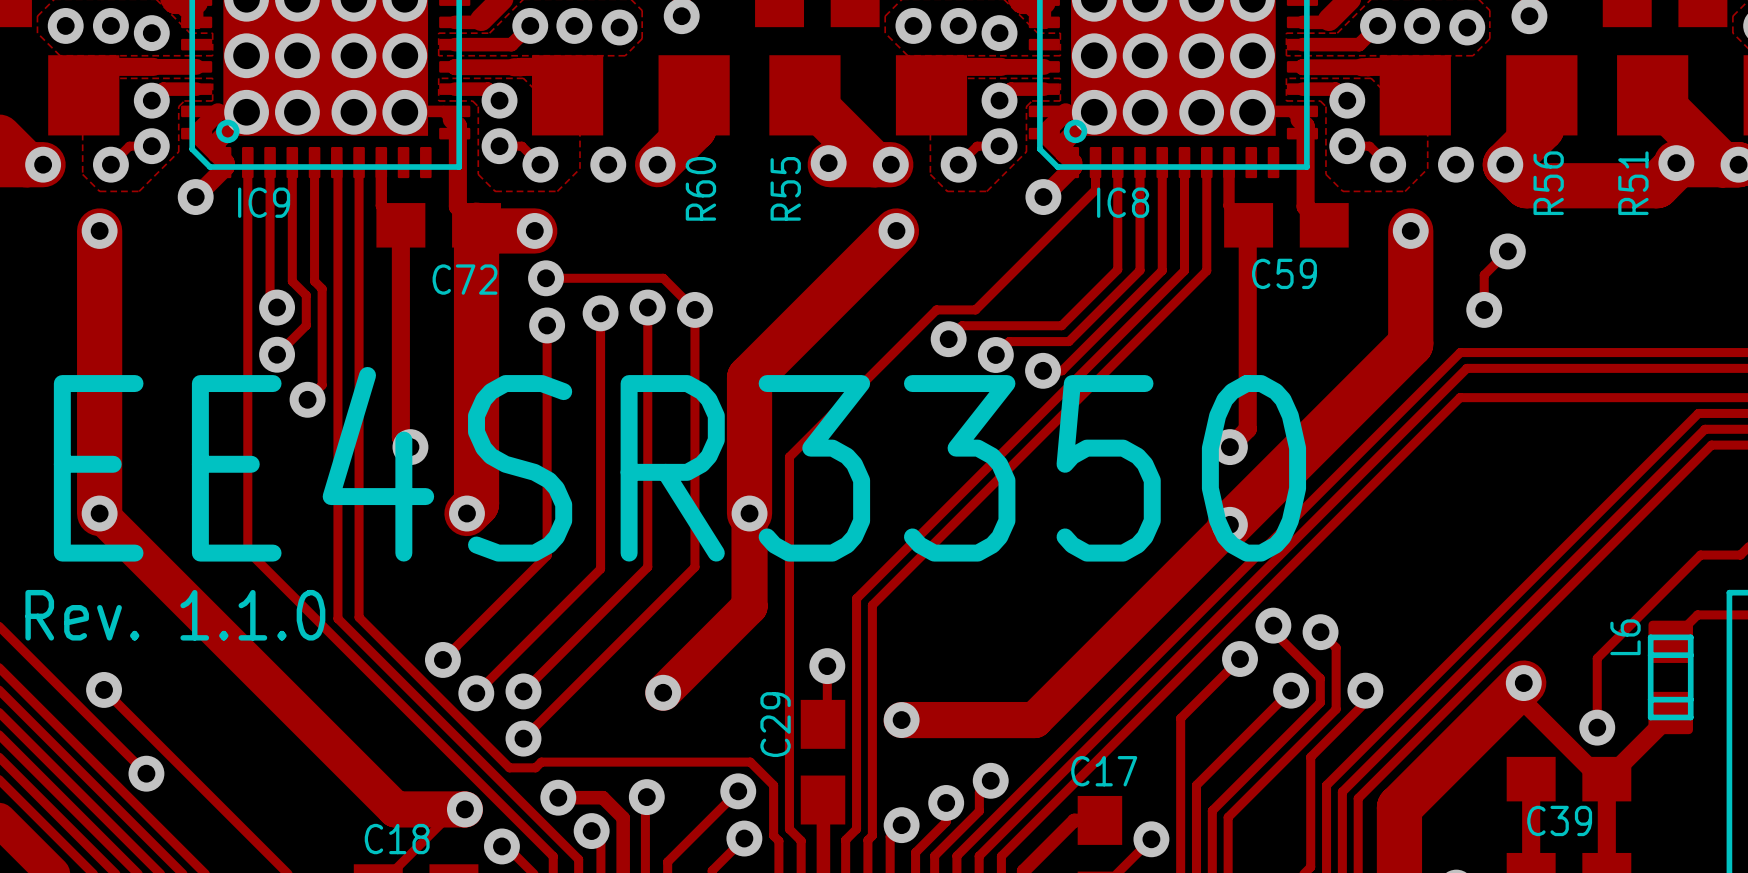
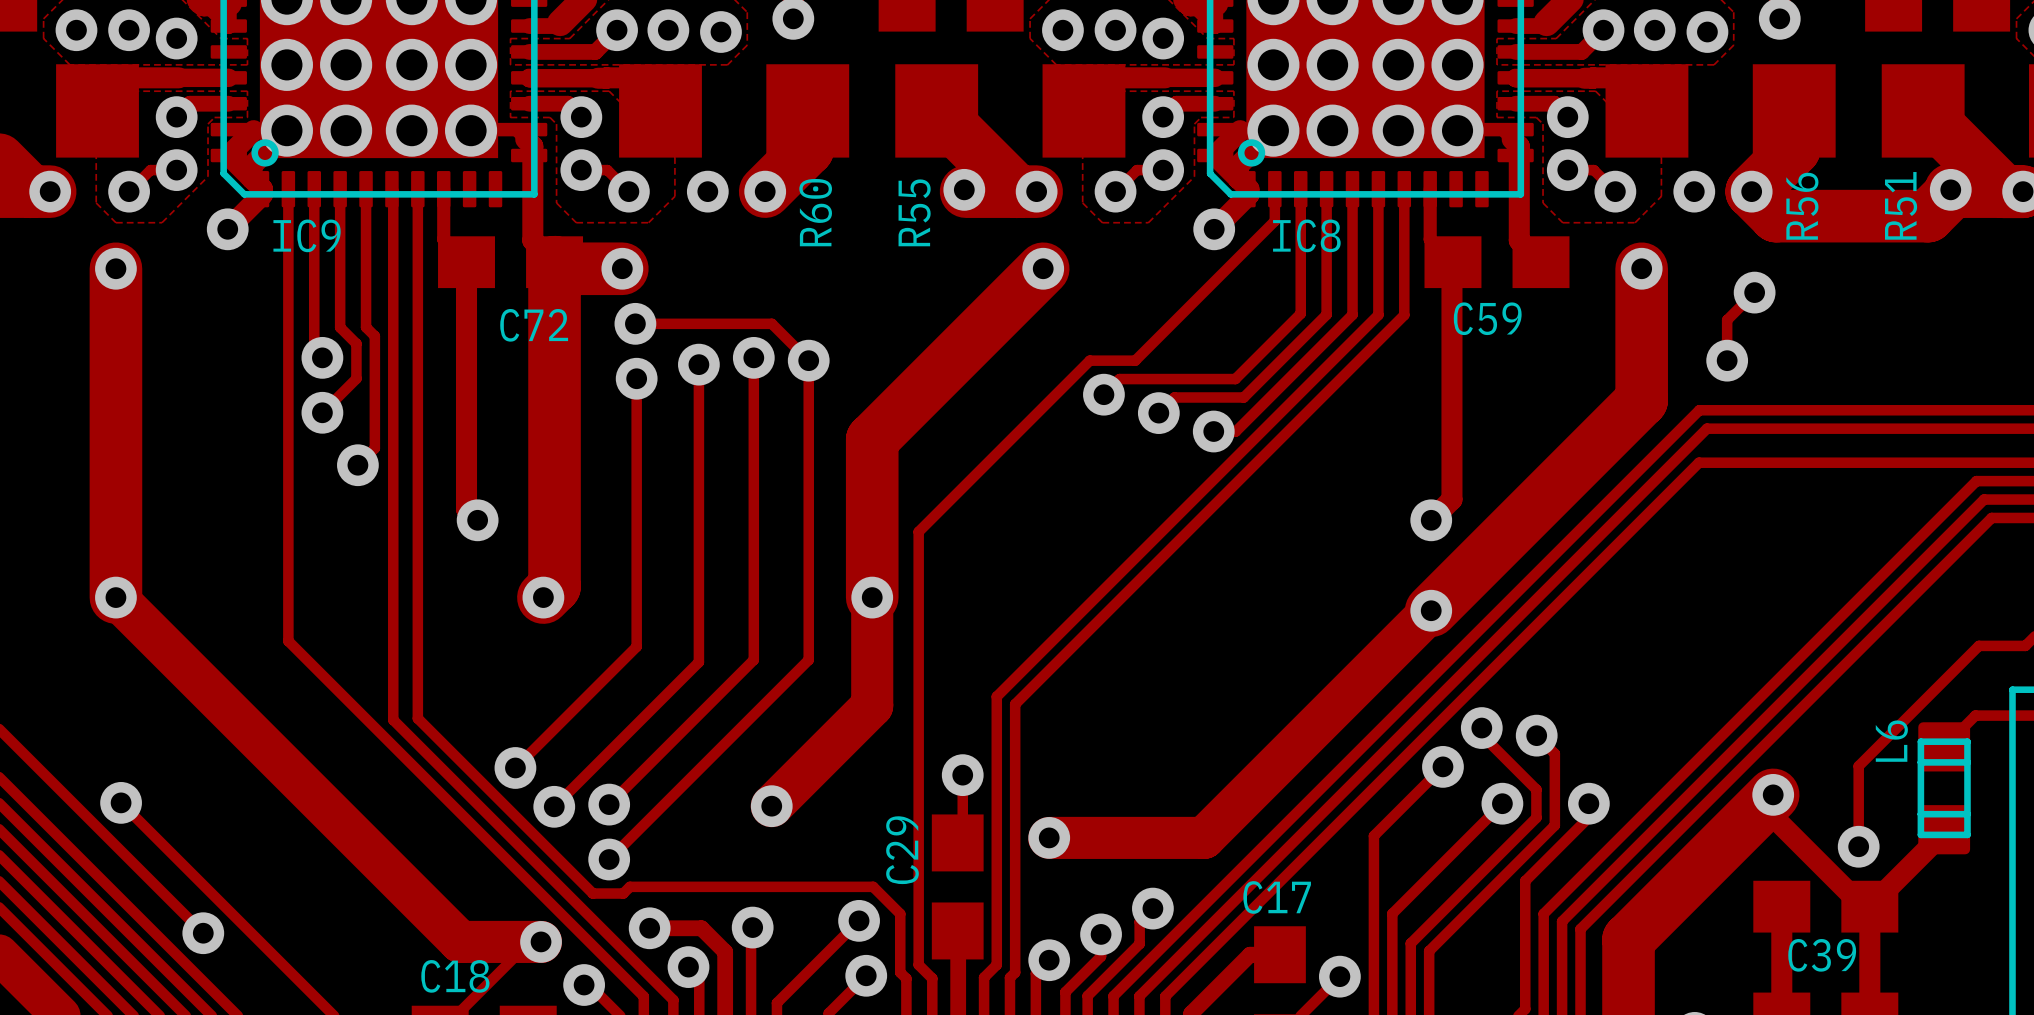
text: EE4SR3350 (679, 464) -> none
text: Rev. 1.1.0 (175, 615) -> none
track: none -> (170, 900) (203, 933)
via position: (146, 773) -> (203, 933)

